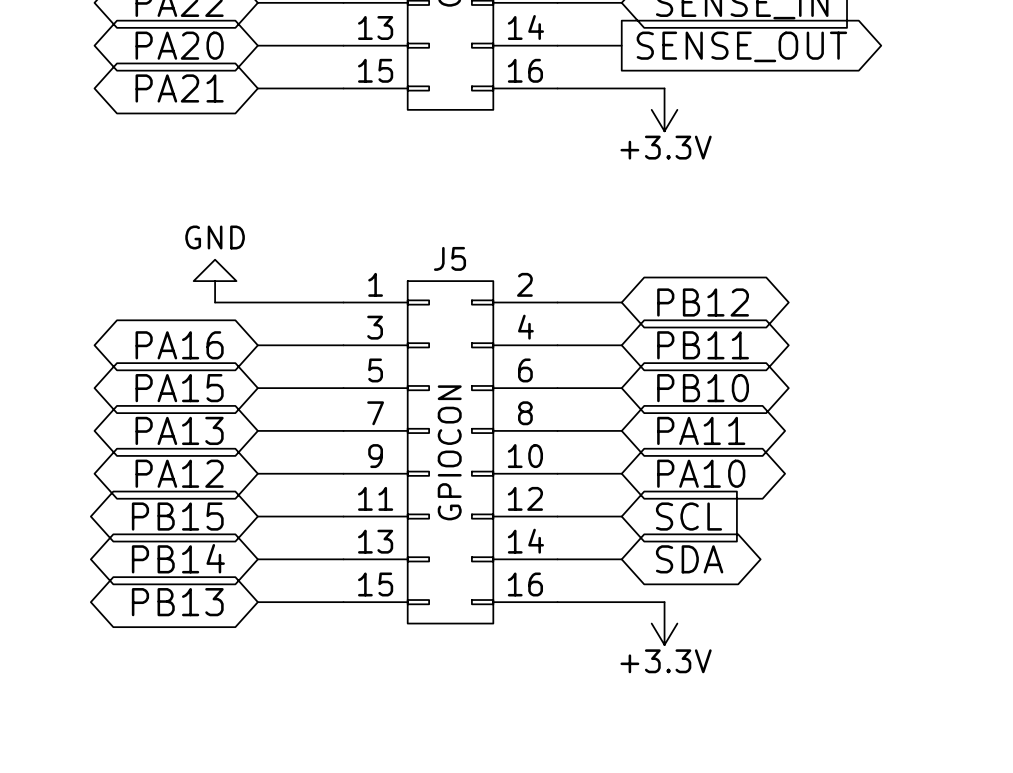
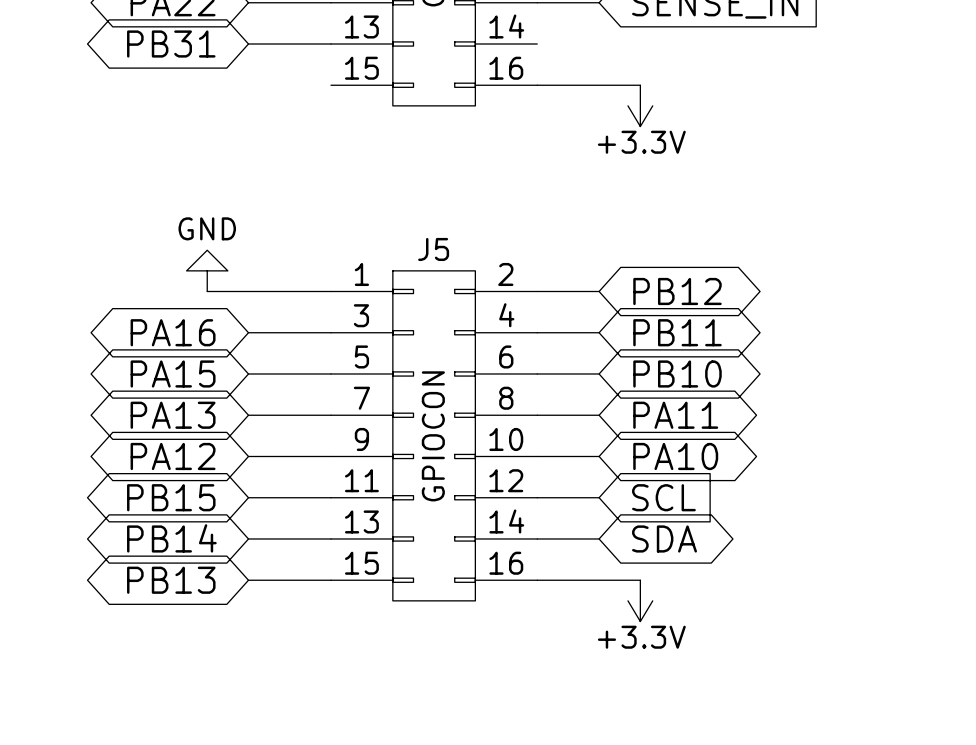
global label: PA20 (179, 45) -> PB31 (171, 44)
wire: (557, 45) (621, 45) -> none
global label: SENSE_OUT (741, 46) -> none
global label: PA21 (179, 88) -> none
wire: (257, 88) (343, 88) -> none

